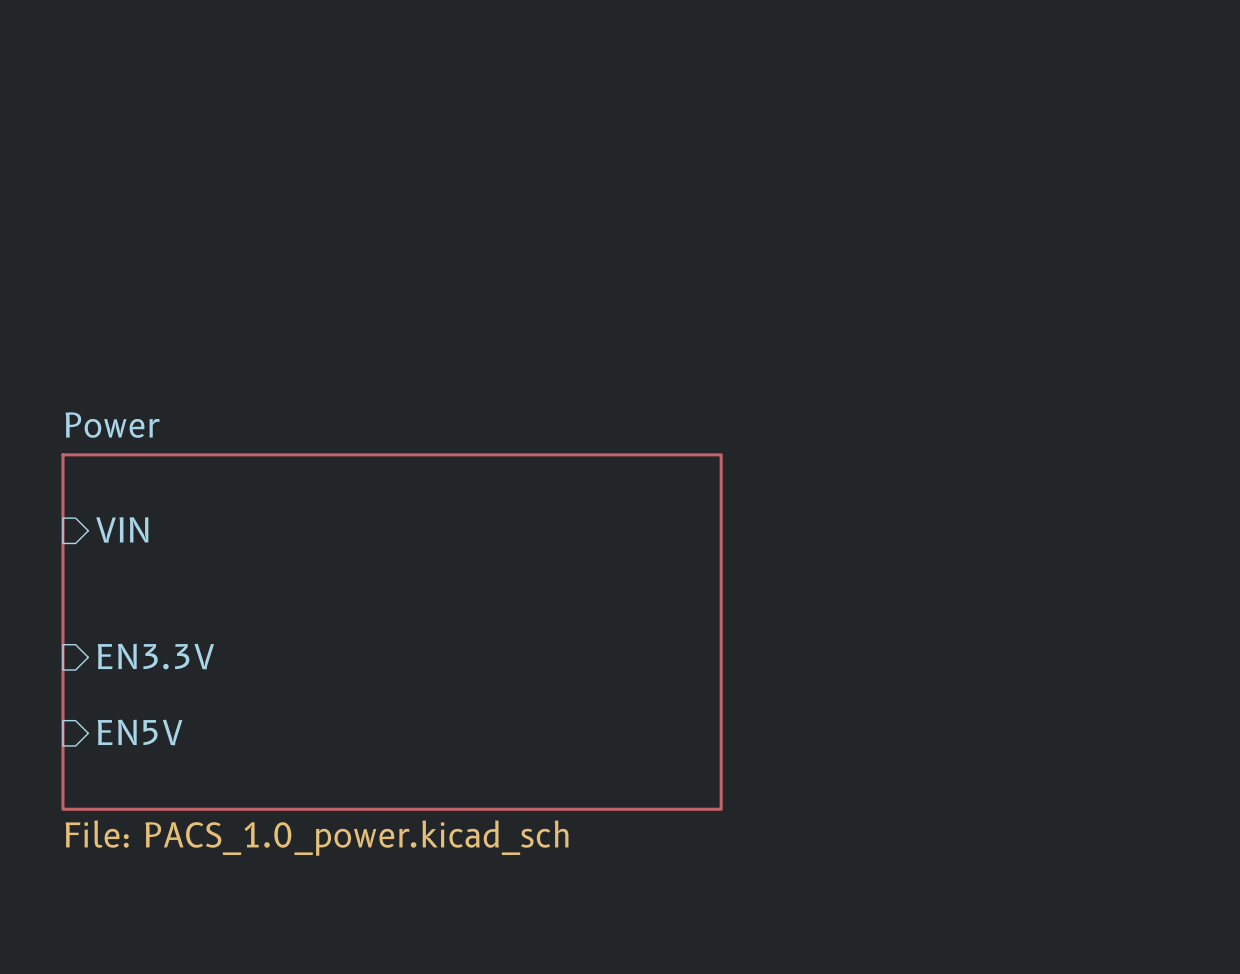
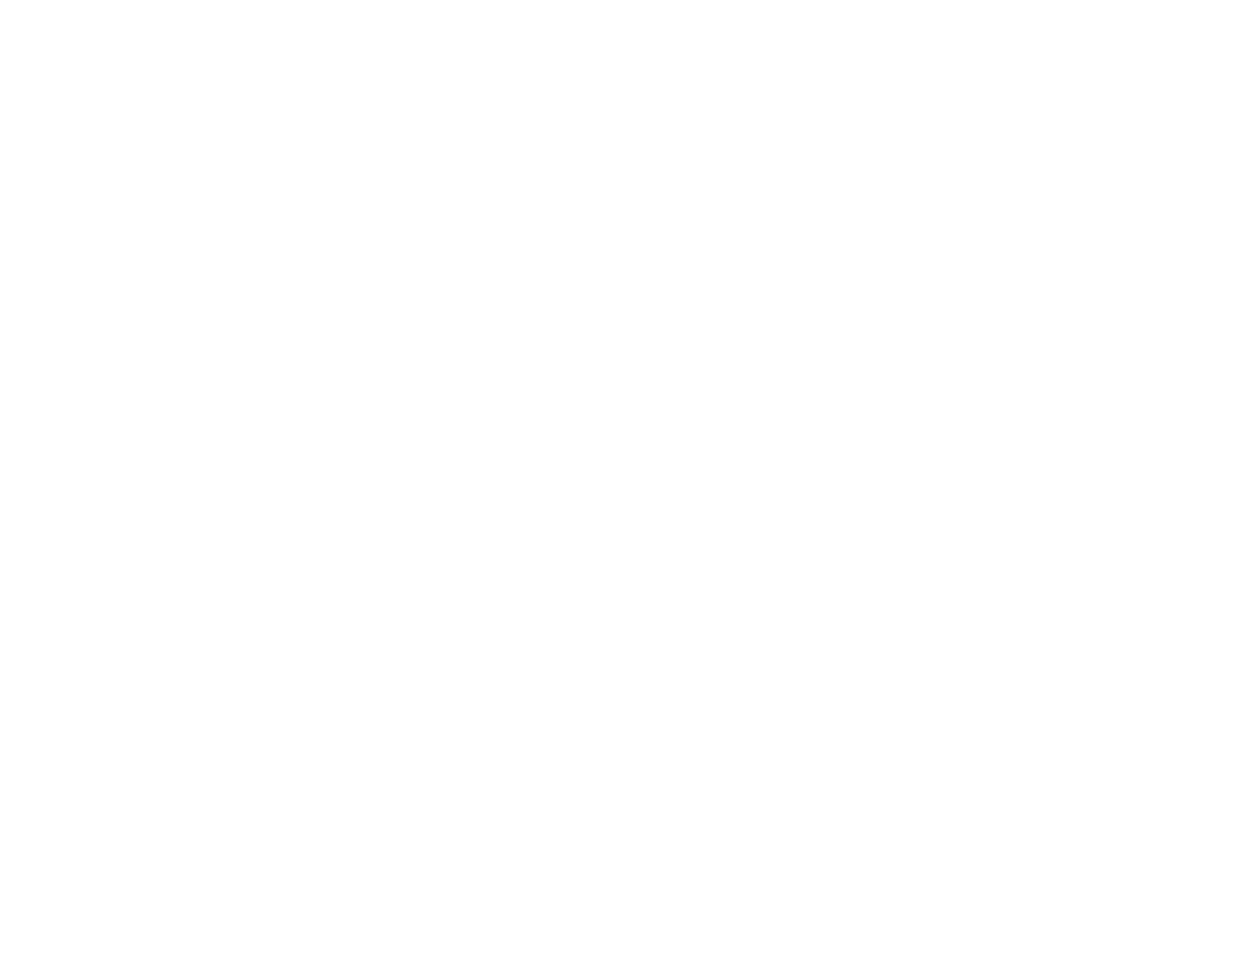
sheet pin: VIN (122, 530) -> none
sheet Power: File: PACS_1.0_power.kicad_sch (392, 632) -> none
sheet pin: EN3.3V (155, 656) -> none
sheet pin: EN5V (140, 732) -> none

